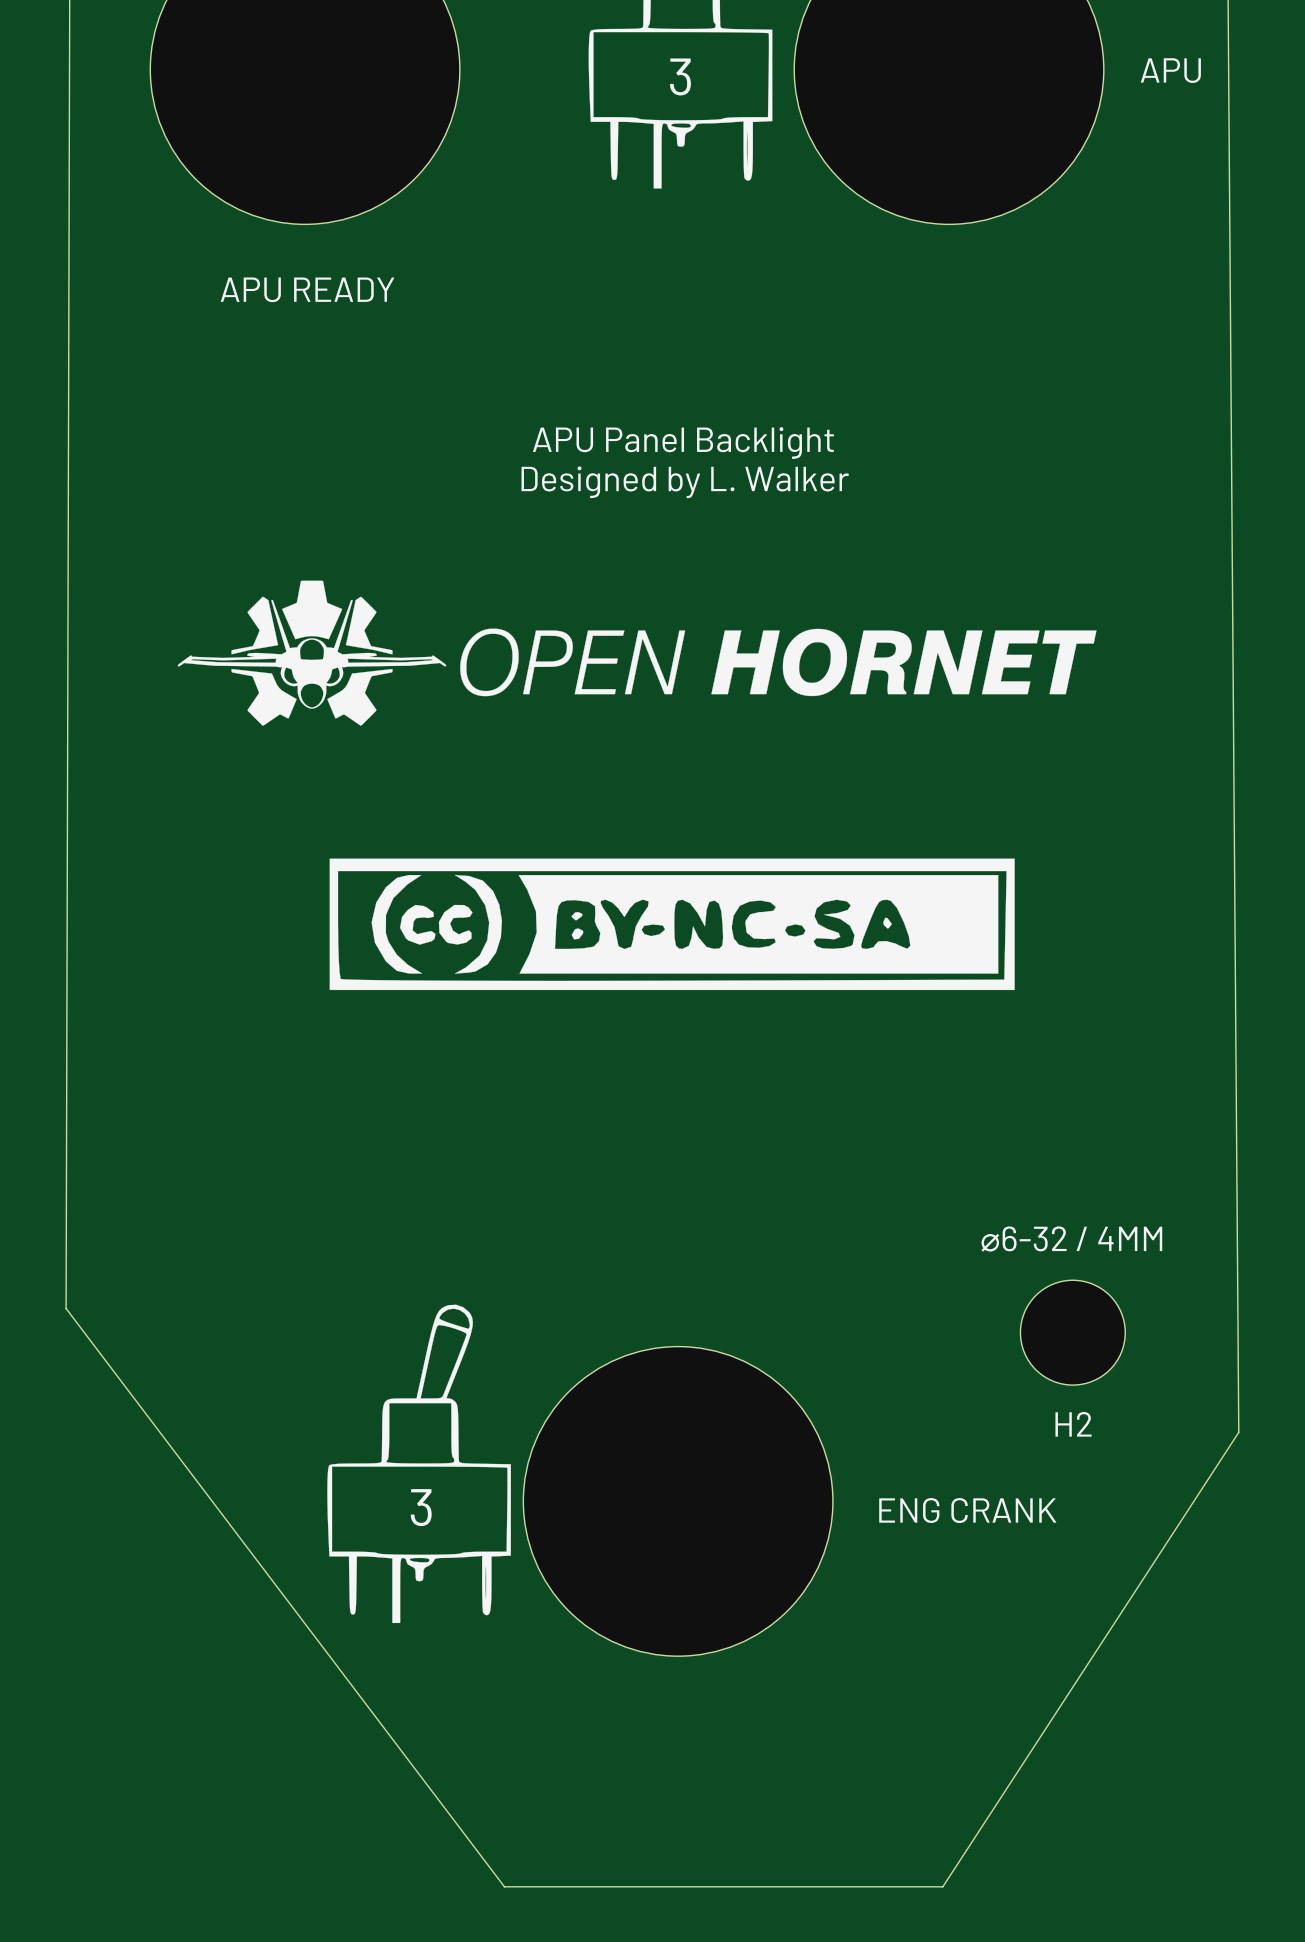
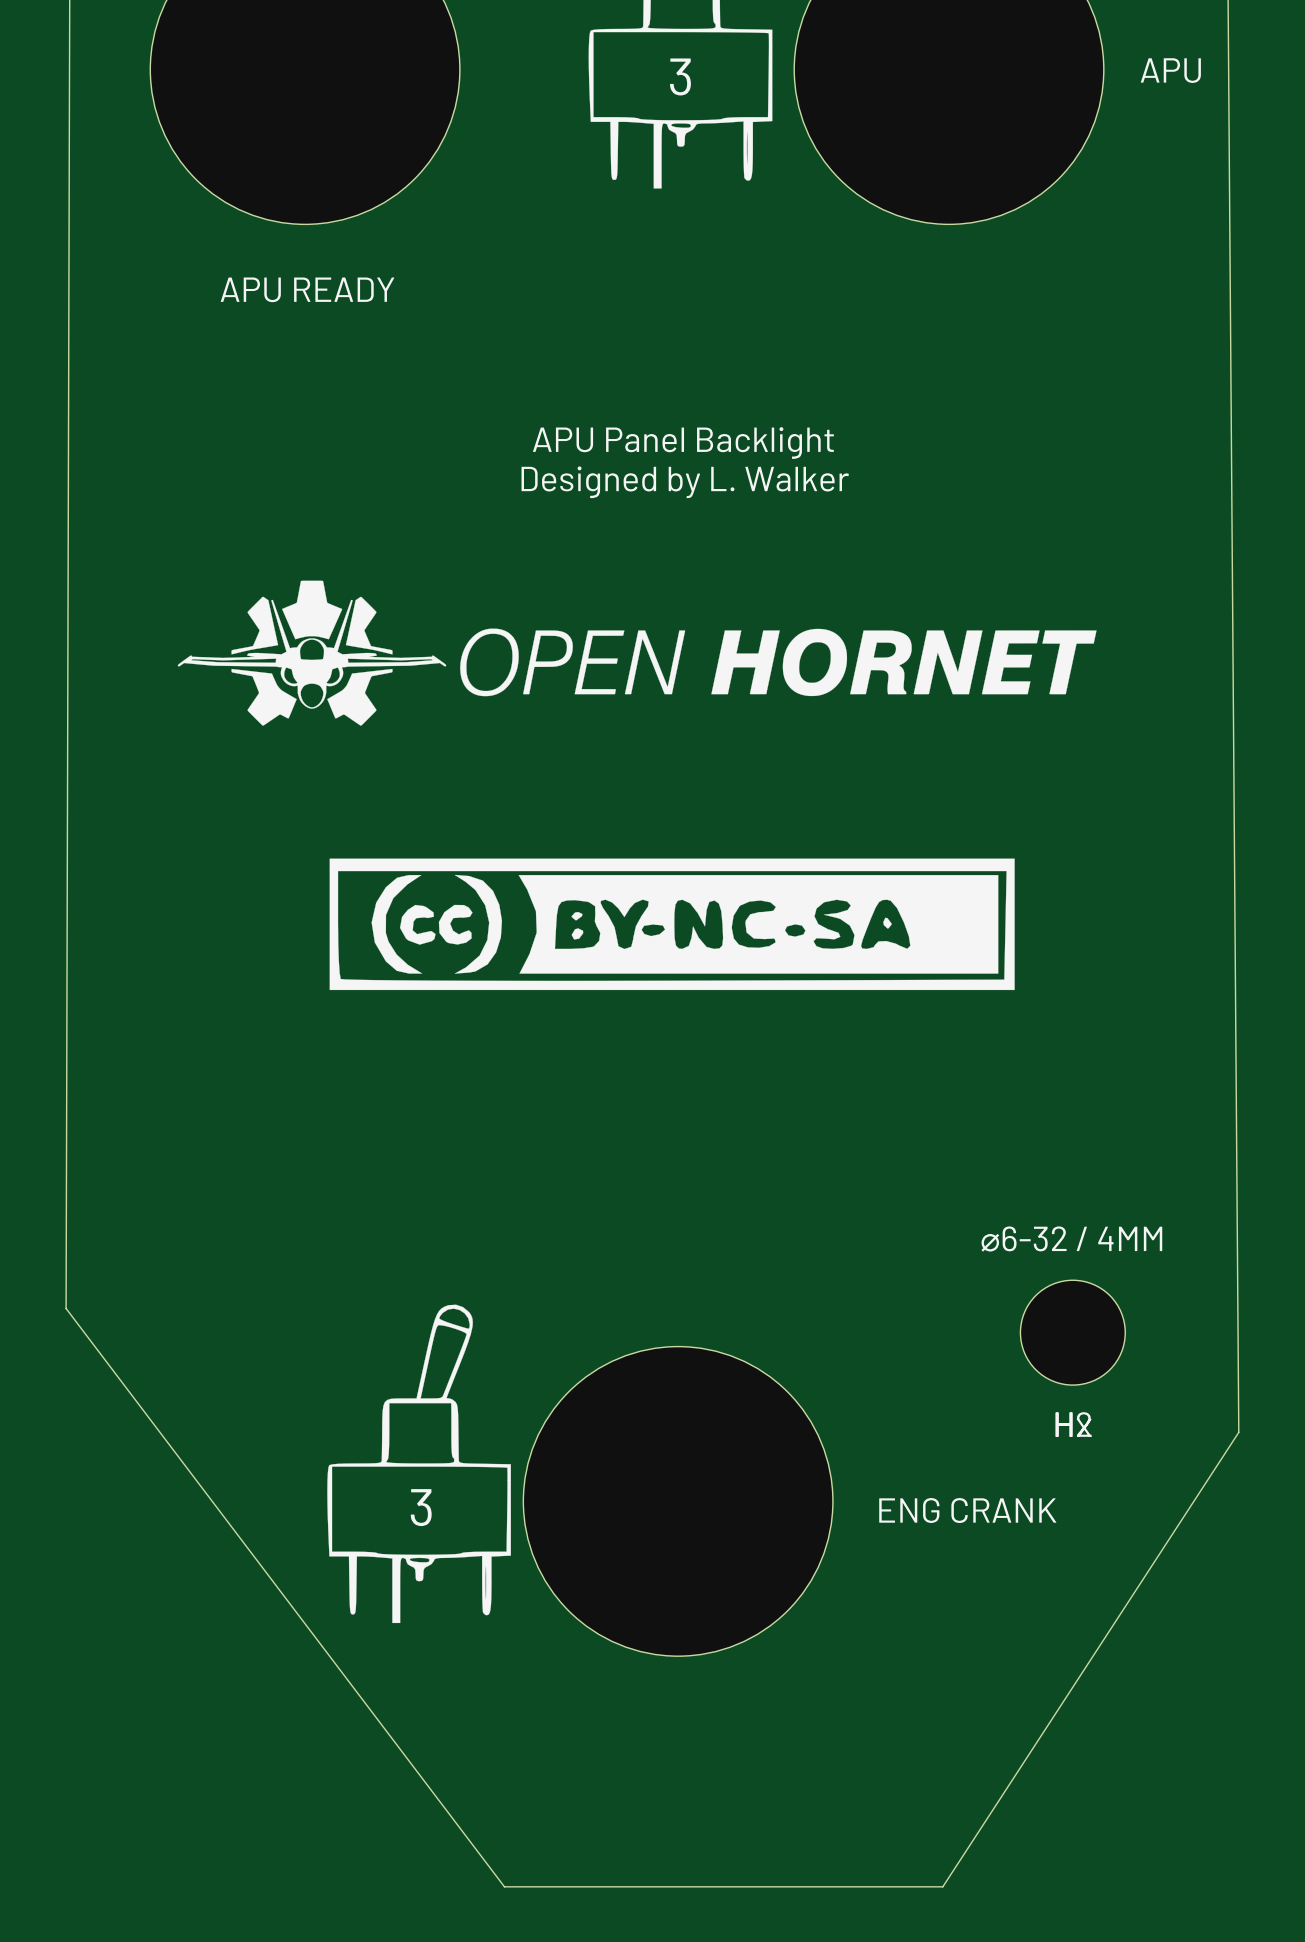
part footprint: [1020, 1280, 1126, 1386] -> [1020, 1280, 1126, 1386]

